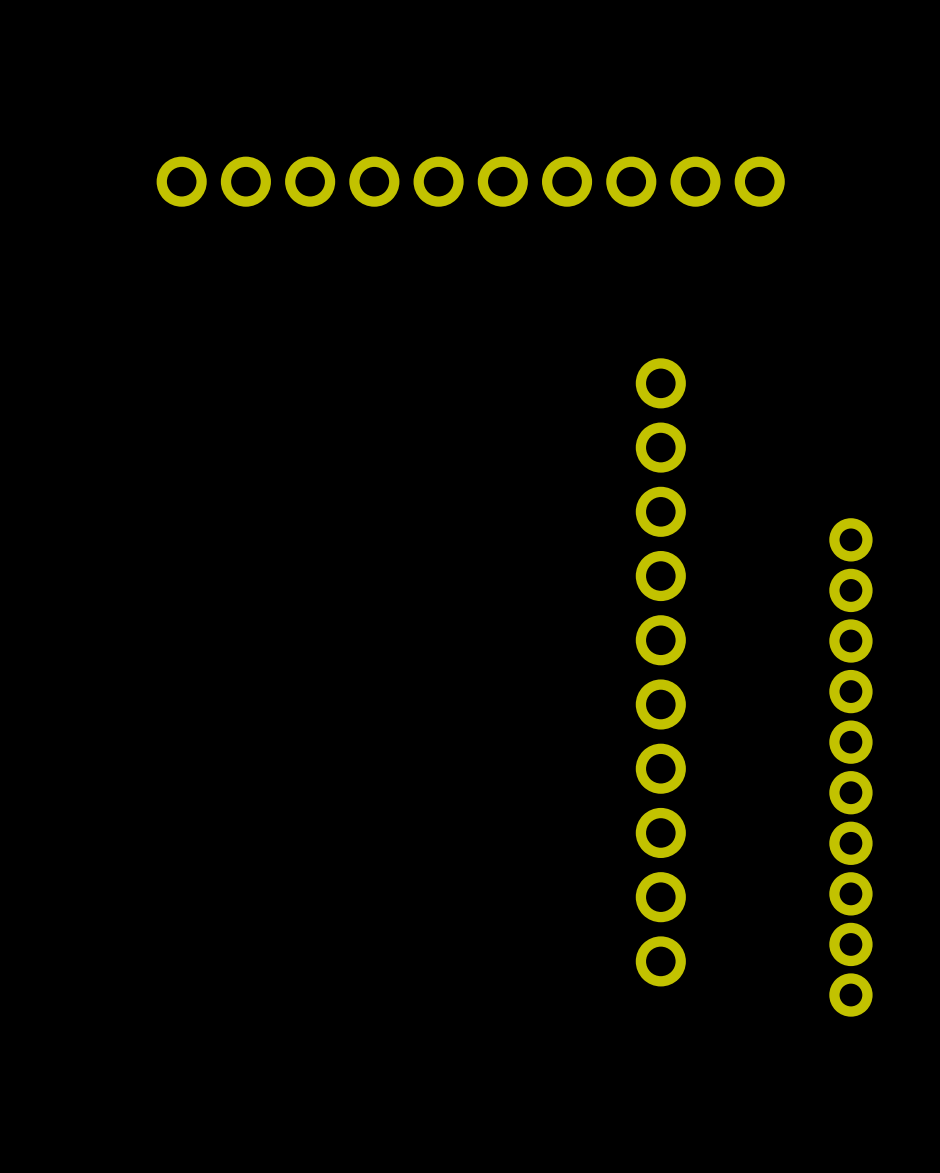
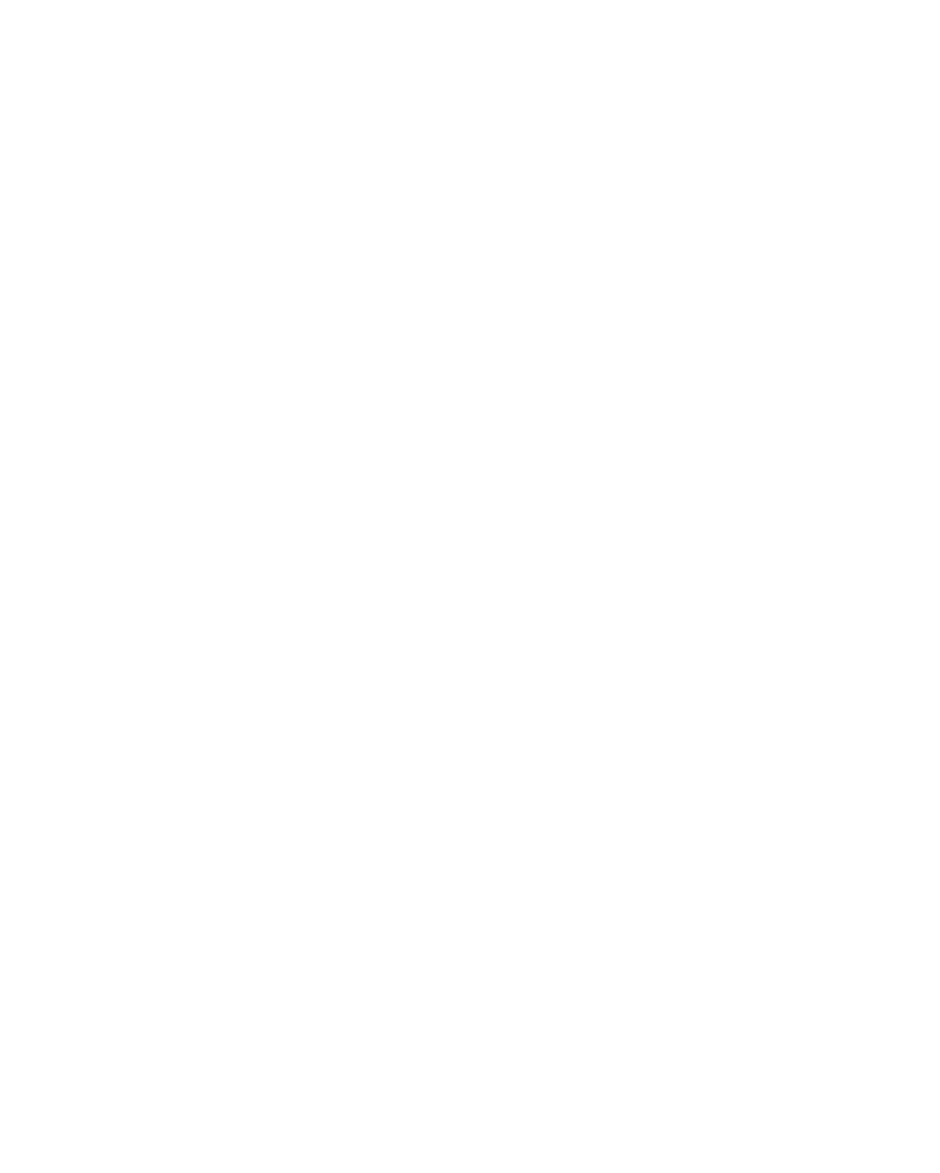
part: (470, 181) -> none
part: (660, 672) -> none
part: (850, 767) -> none

